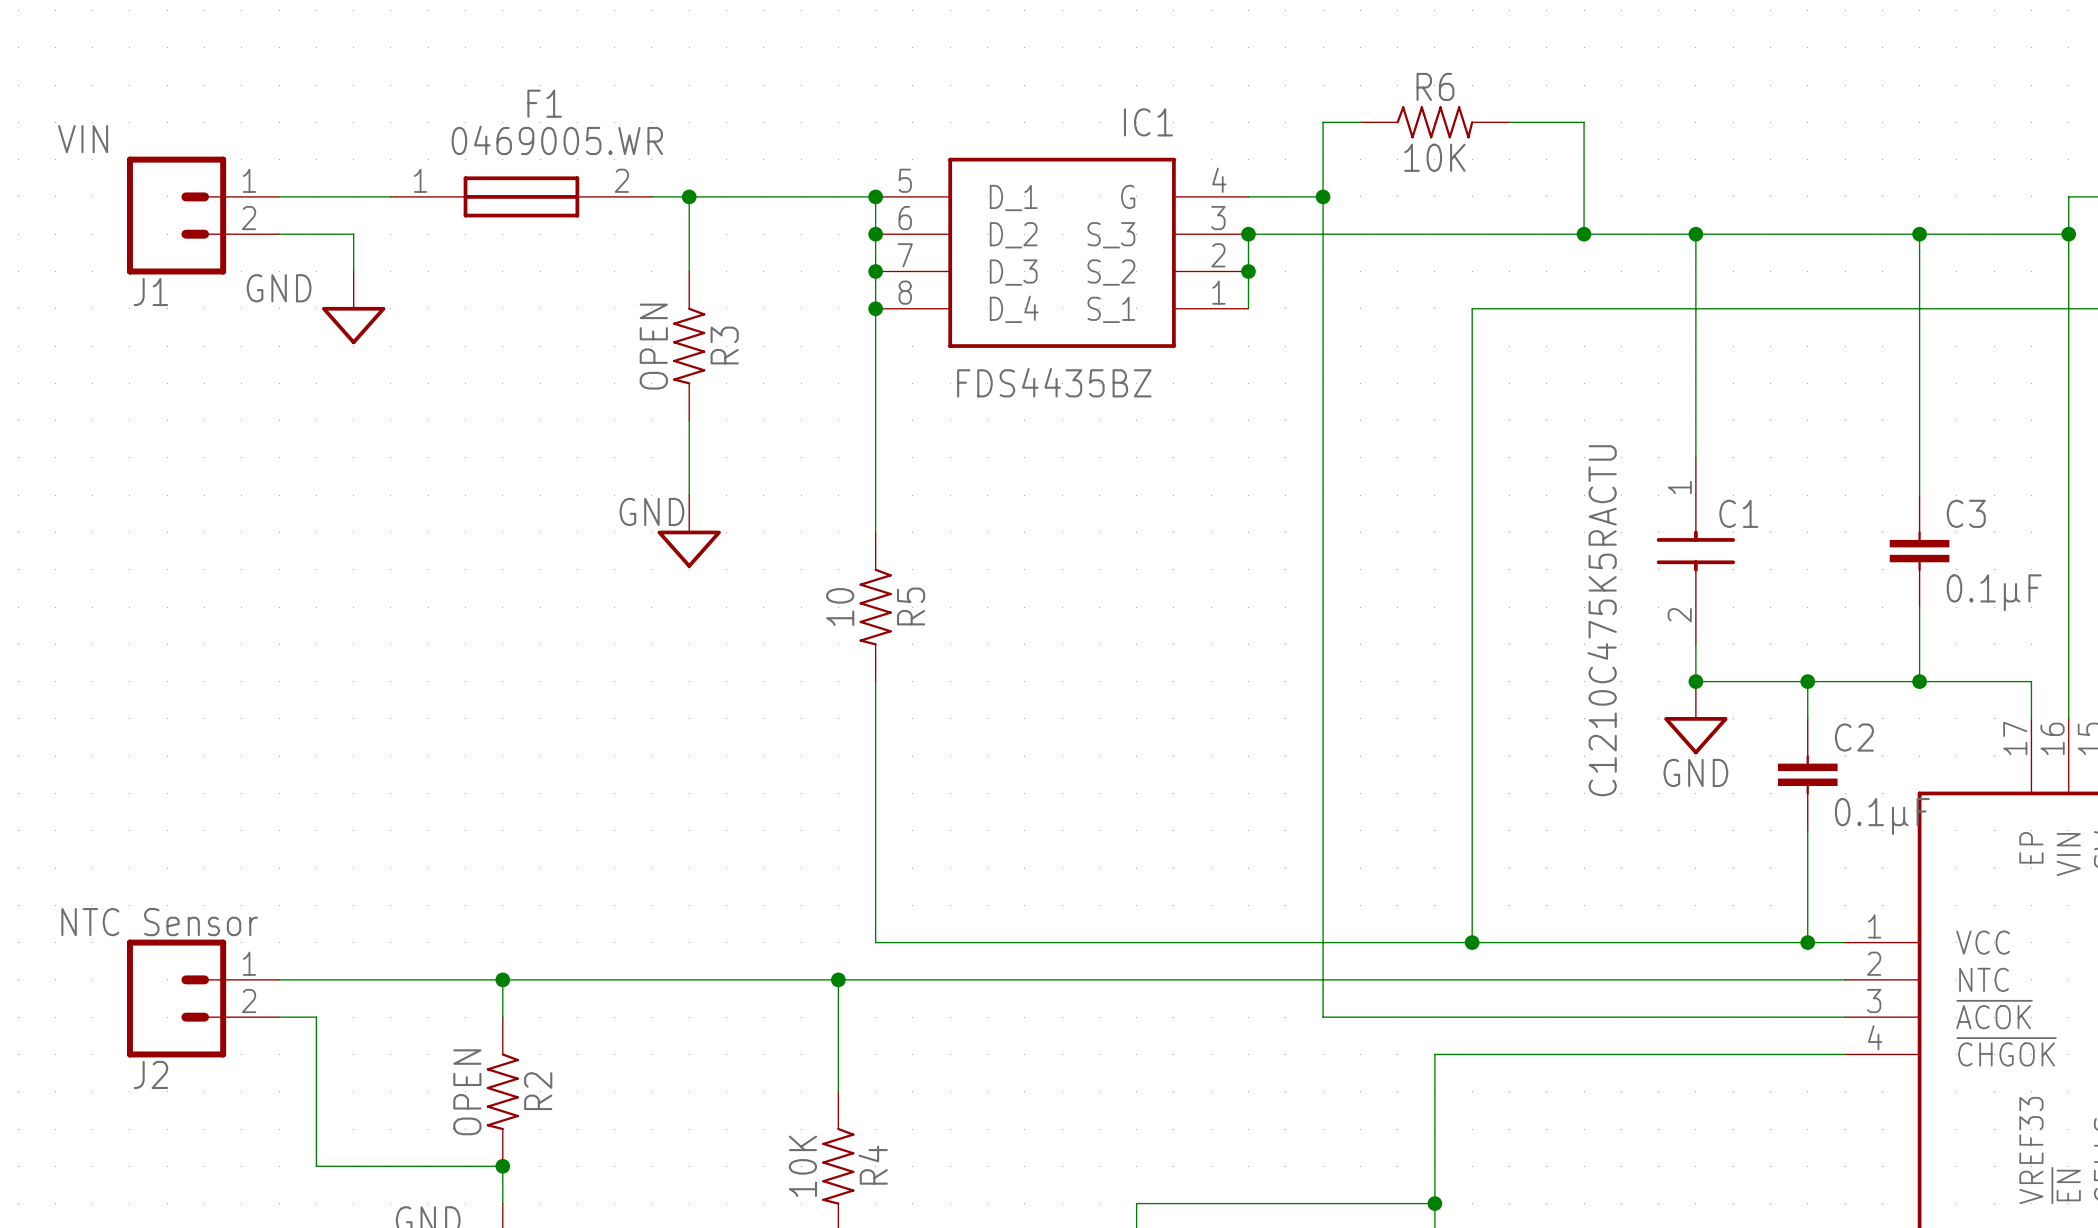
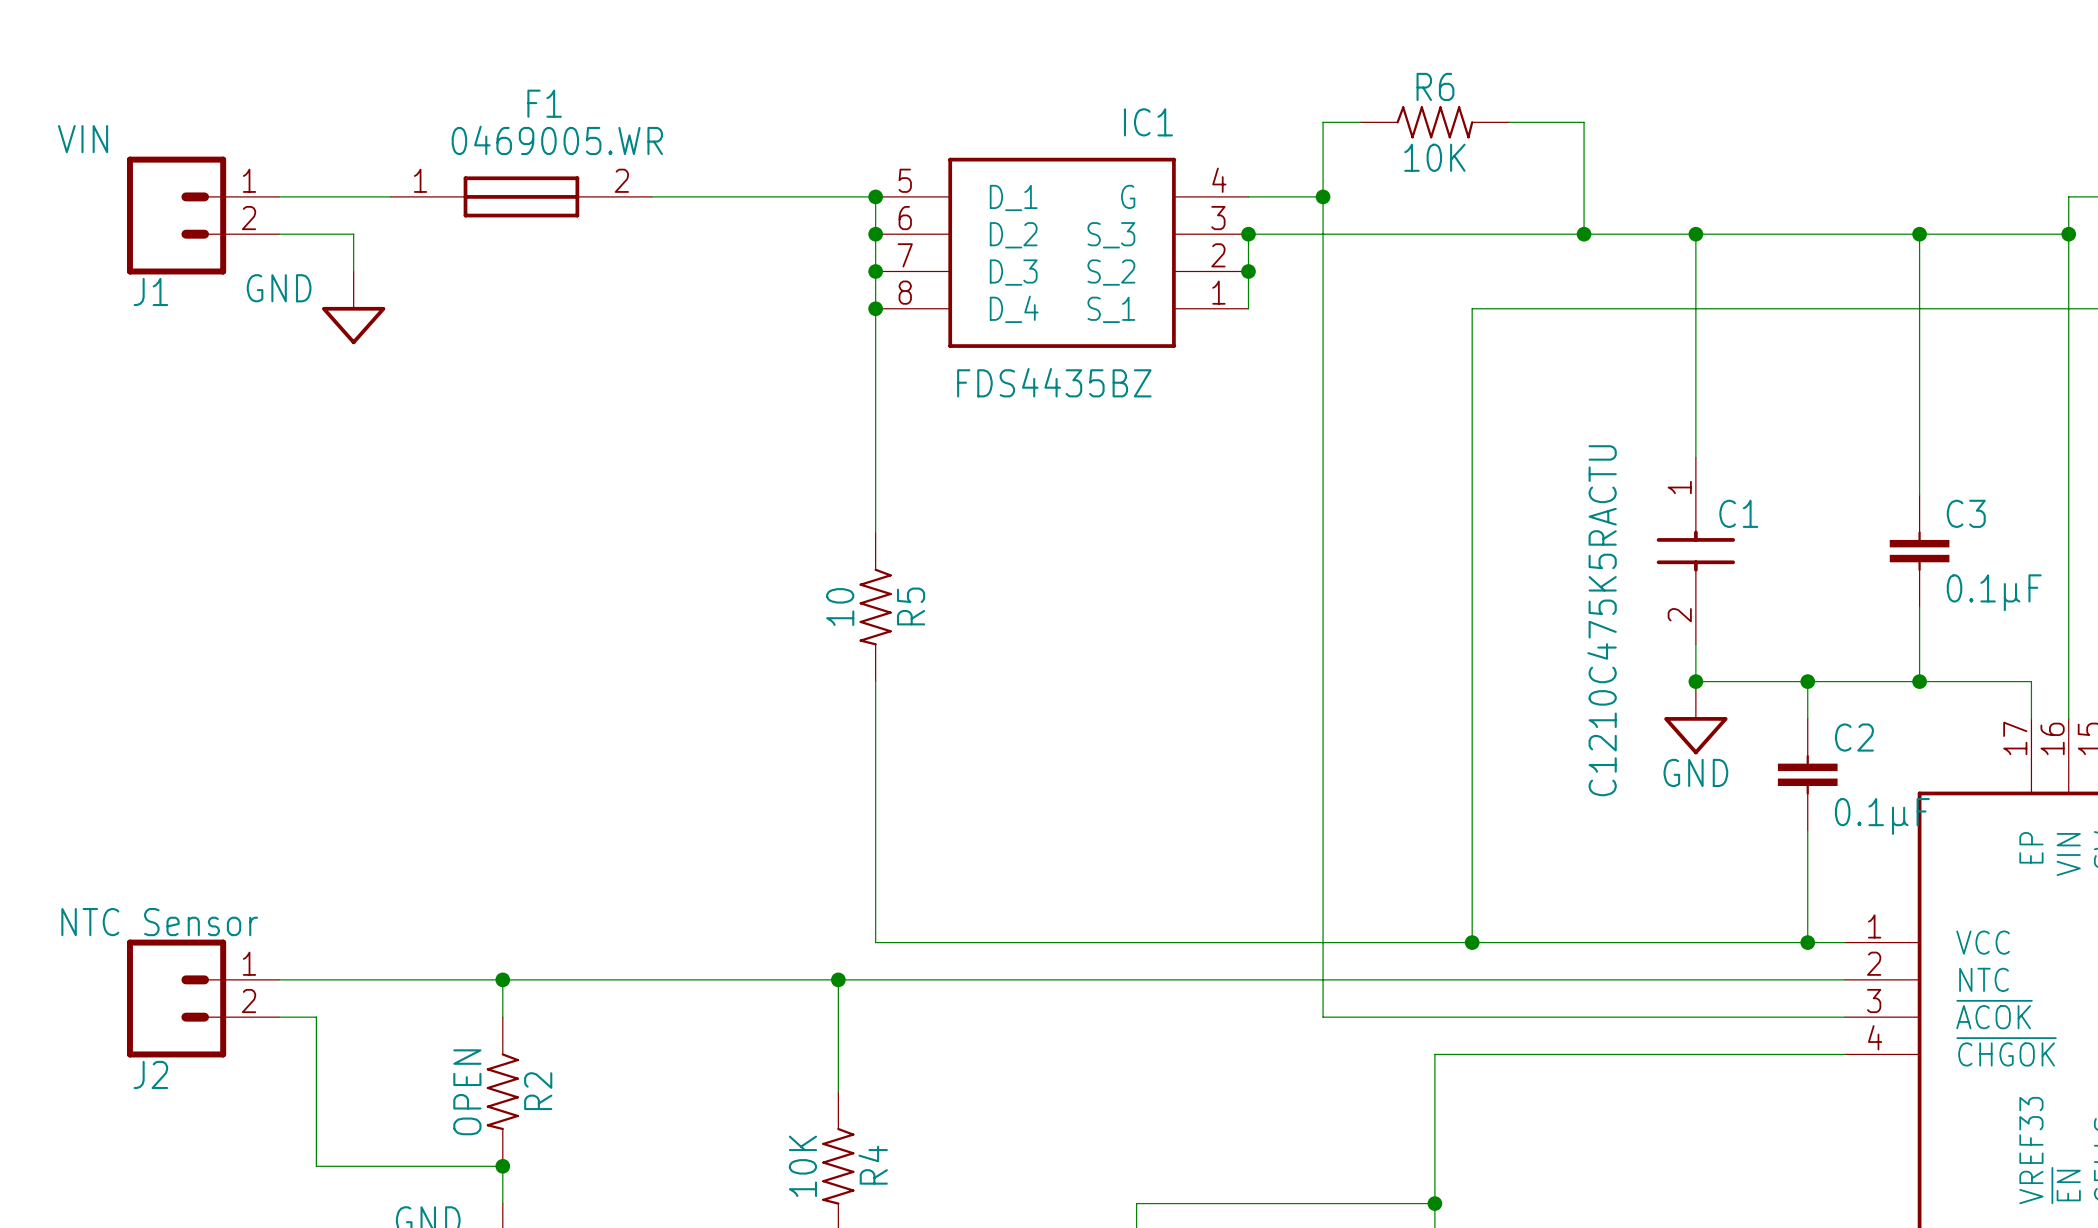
wire: (689, 196) (689, 271) -> none
junction: (689, 196) -> none
R3: OPEN (689, 346) -> none
wire: (689, 420) (689, 495) -> none
power symbol: GND (689, 531) -> none

